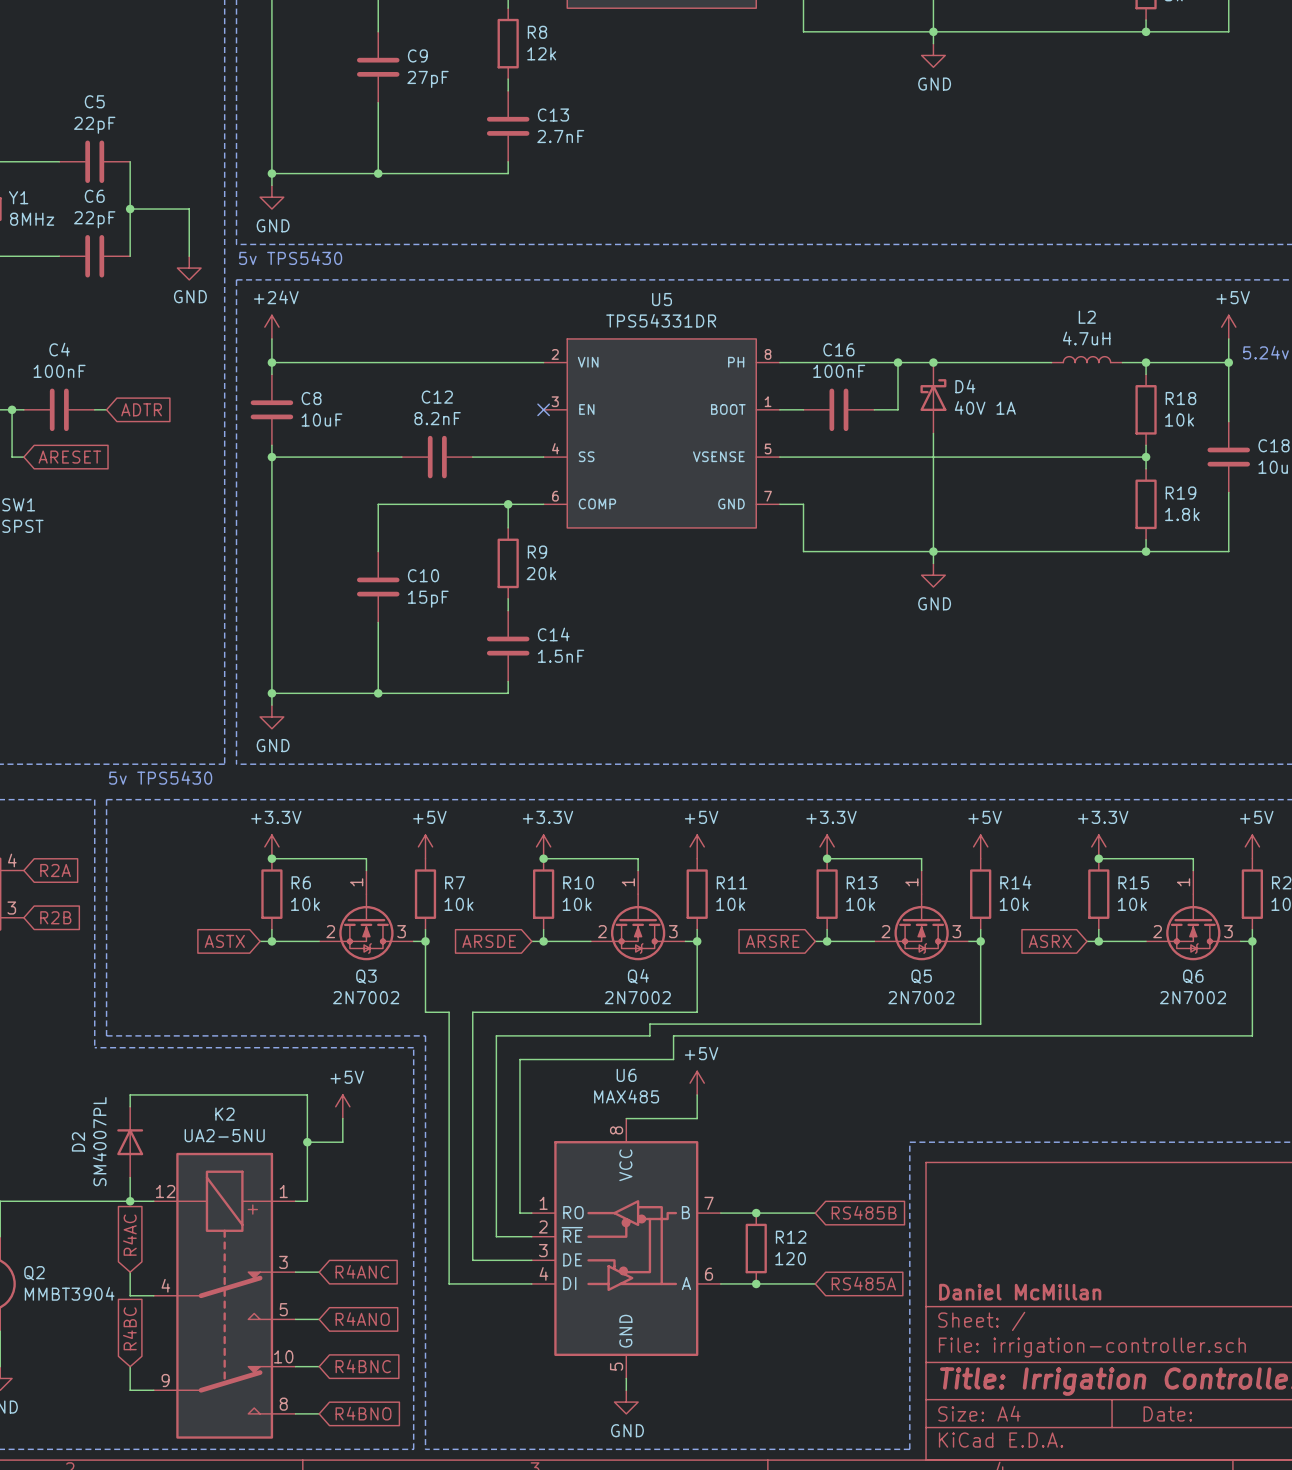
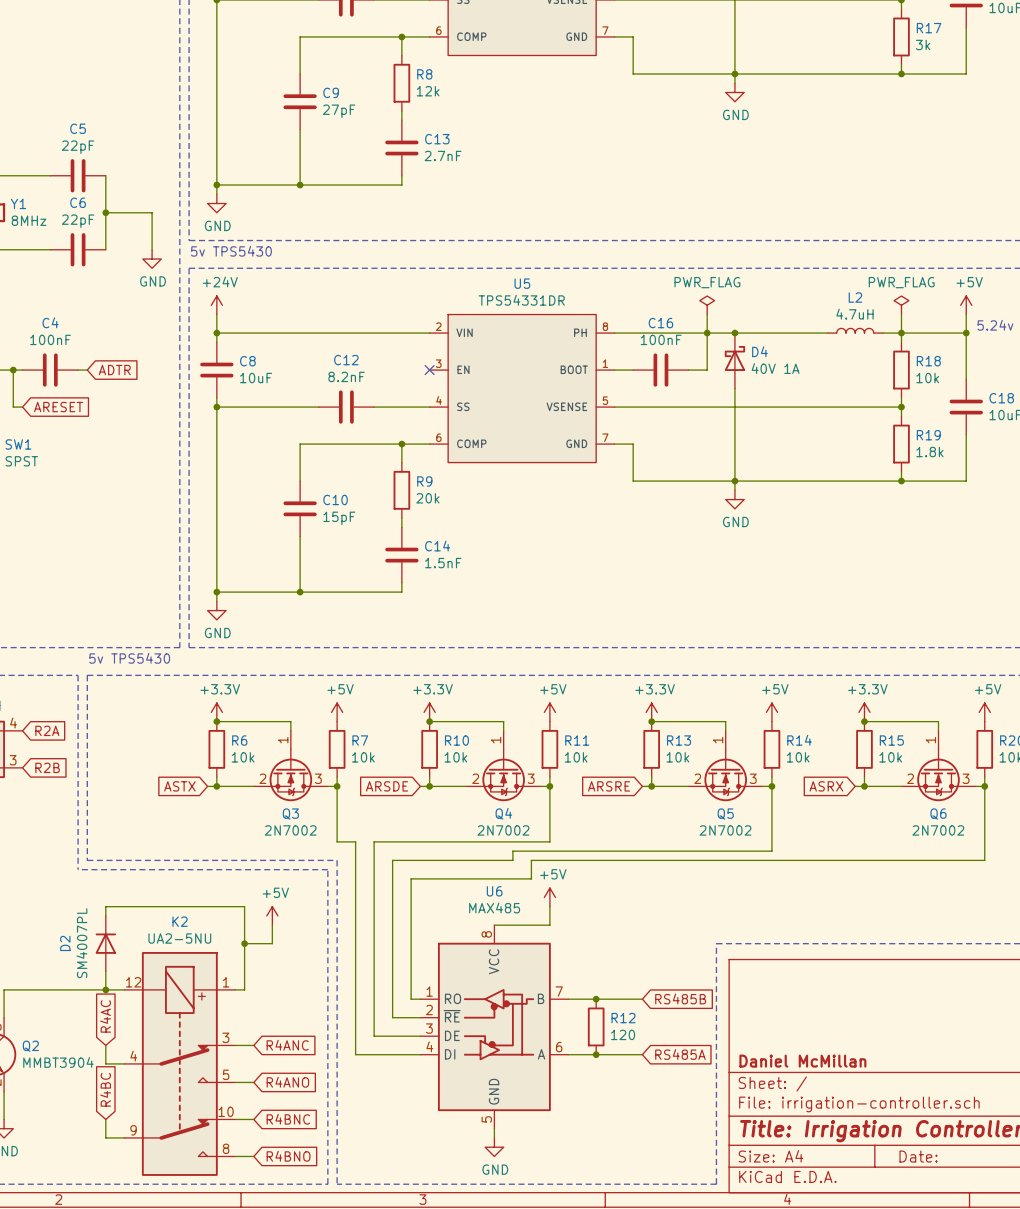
power symbol: none -> PWR_FLAG (707, 305)
power symbol: none -> PWR_FLAG (901, 305)
wire: none -> (707, 314) (707, 333)
wire: none -> (901, 314) (901, 333)

